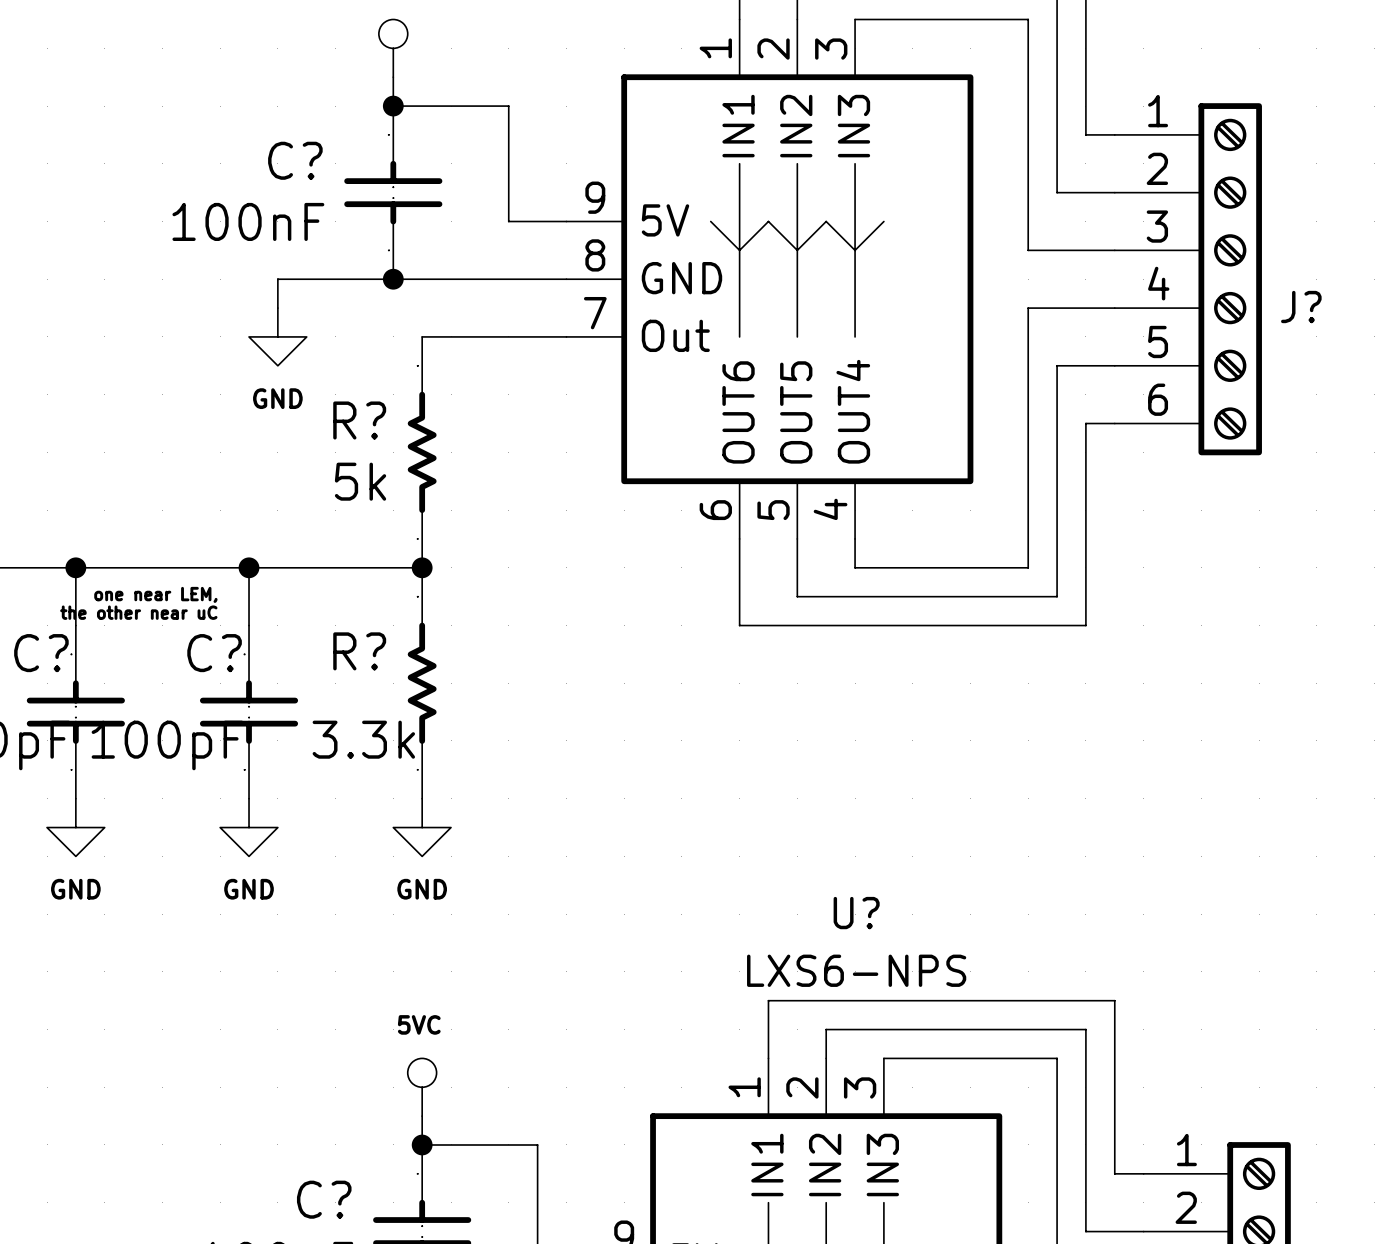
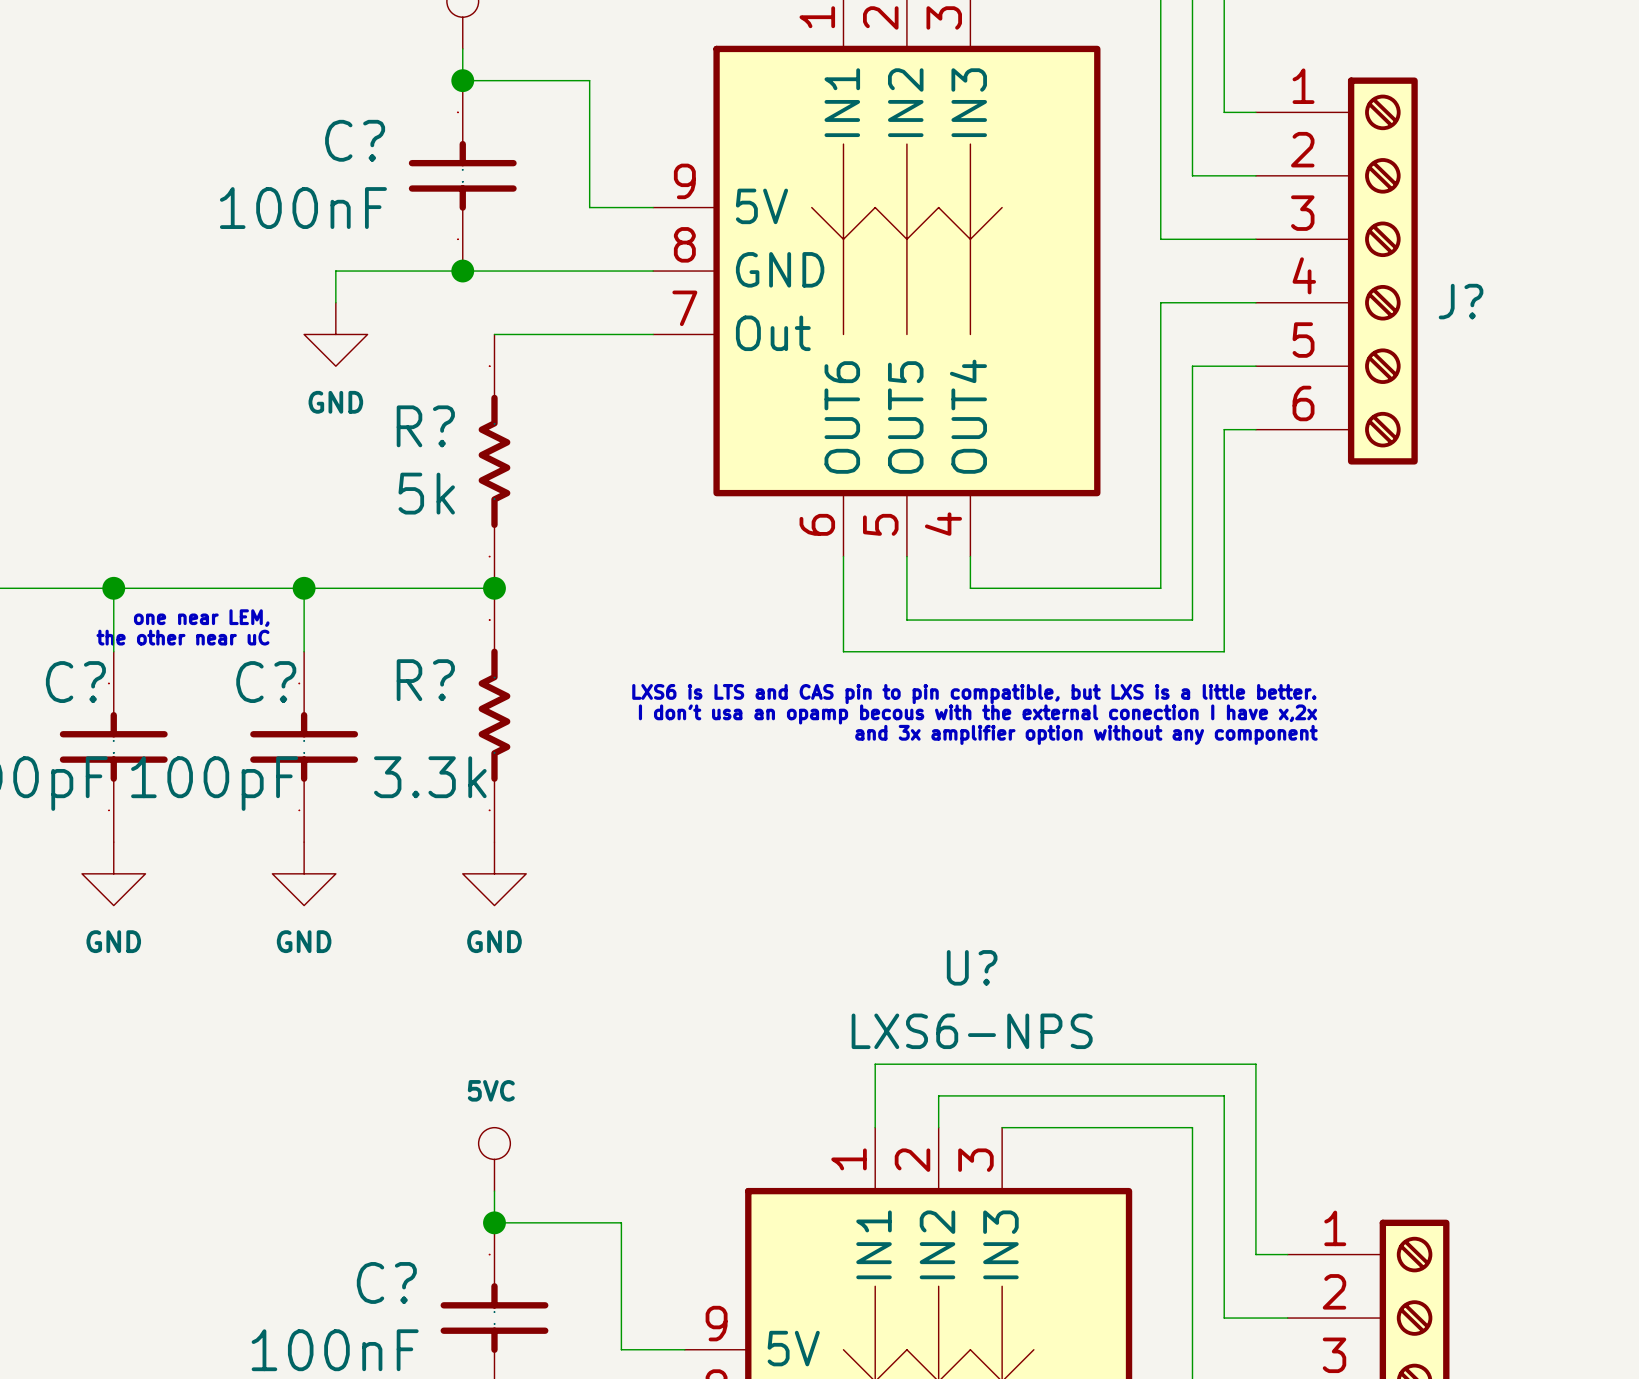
text: none -> LXS6 is LTS and CAS pin to pin compatible, but LXS is a little better. (974, 694)
text: none -> I don't usa an opamp becous with the external conection I have x,2x (977, 714)
text: none -> and 3x amplifier option without any component (1086, 734)

